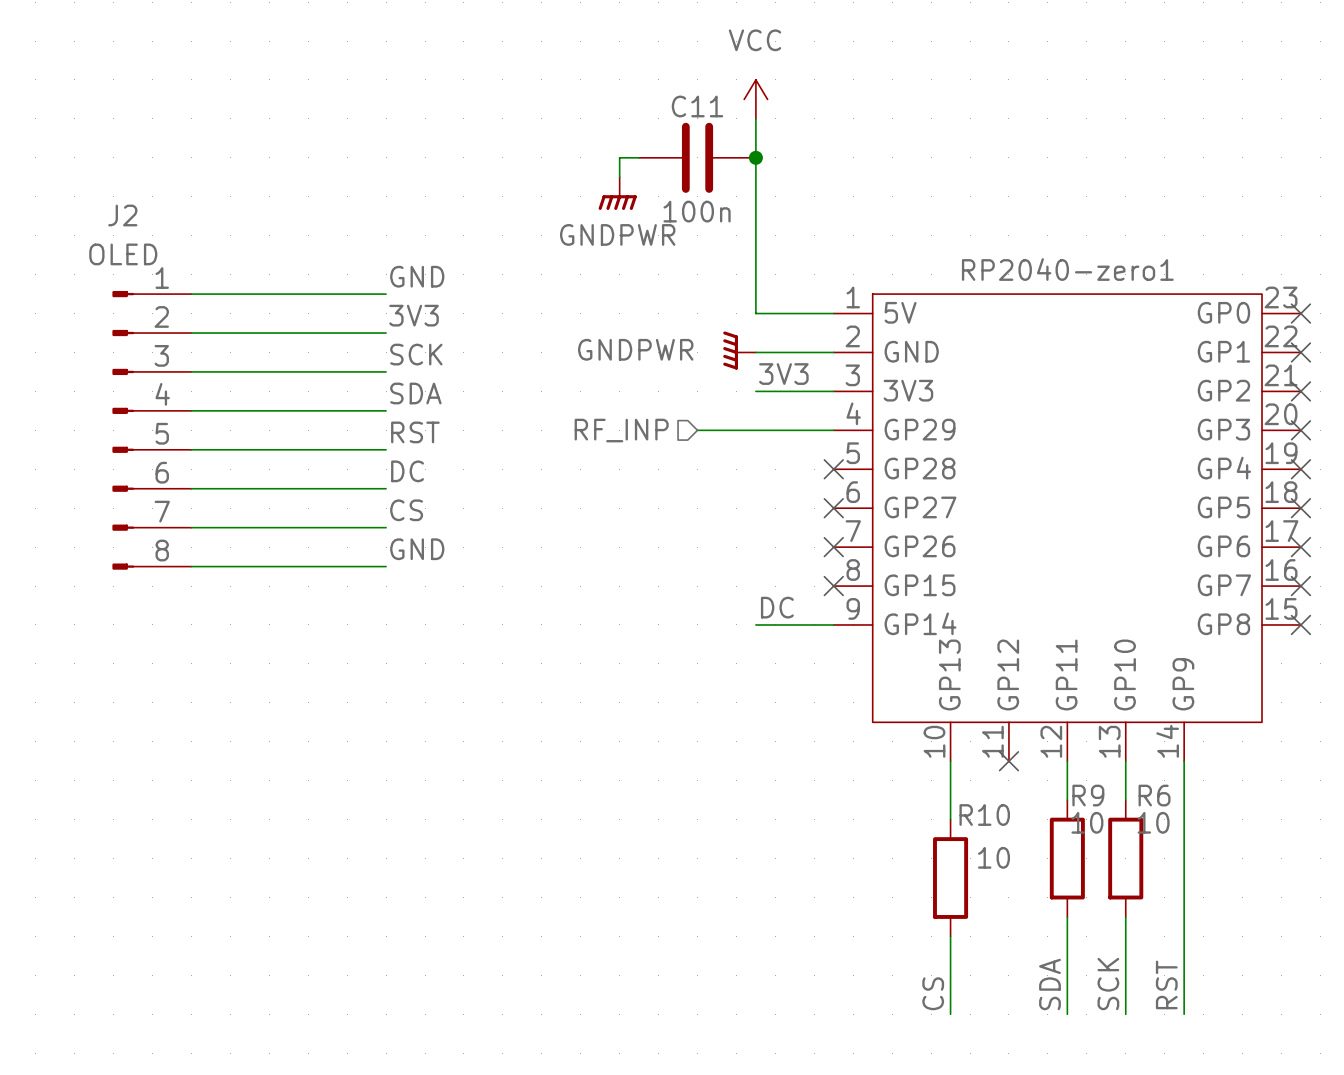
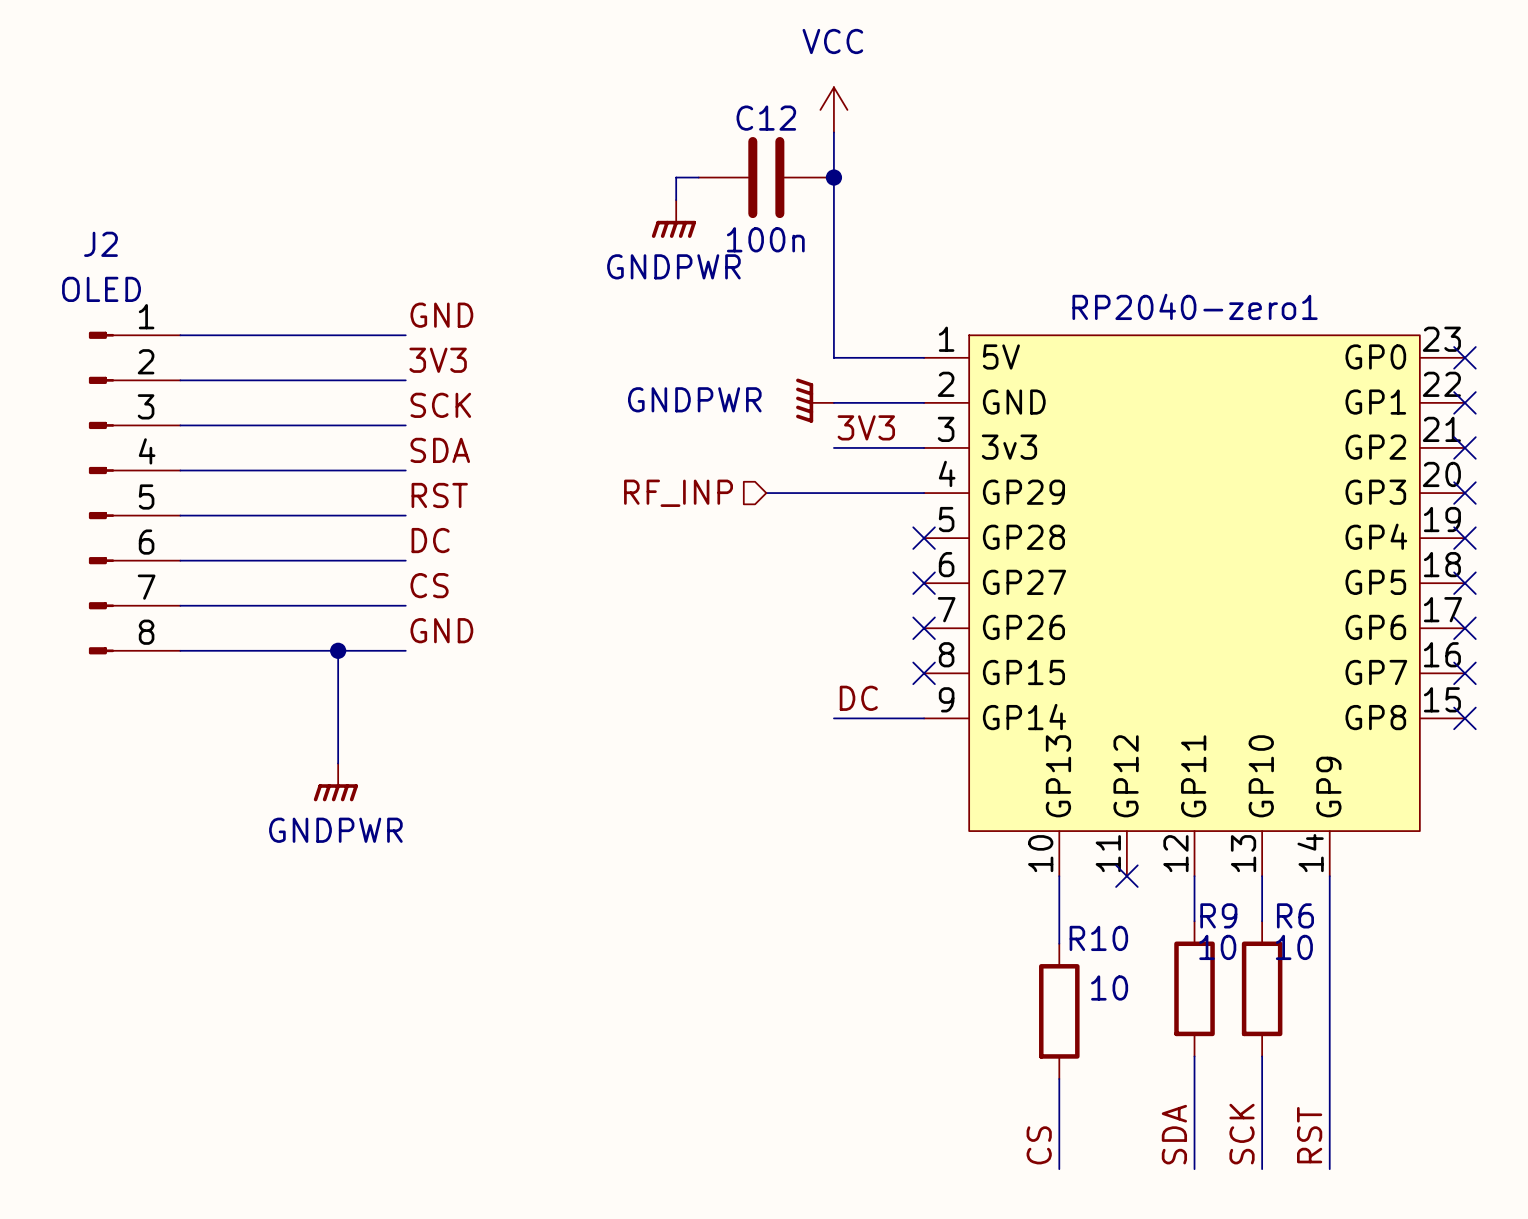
C11 name: C11 (697, 106) -> C12 (766, 118)
RP2040-zero1 pin name: 3V3 (908, 390) -> 3v3 (1009, 447)
wire: none -> (338, 650) (338, 763)
junction: none -> (338, 650)
power symbol: none -> GNDPWR (335, 782)

